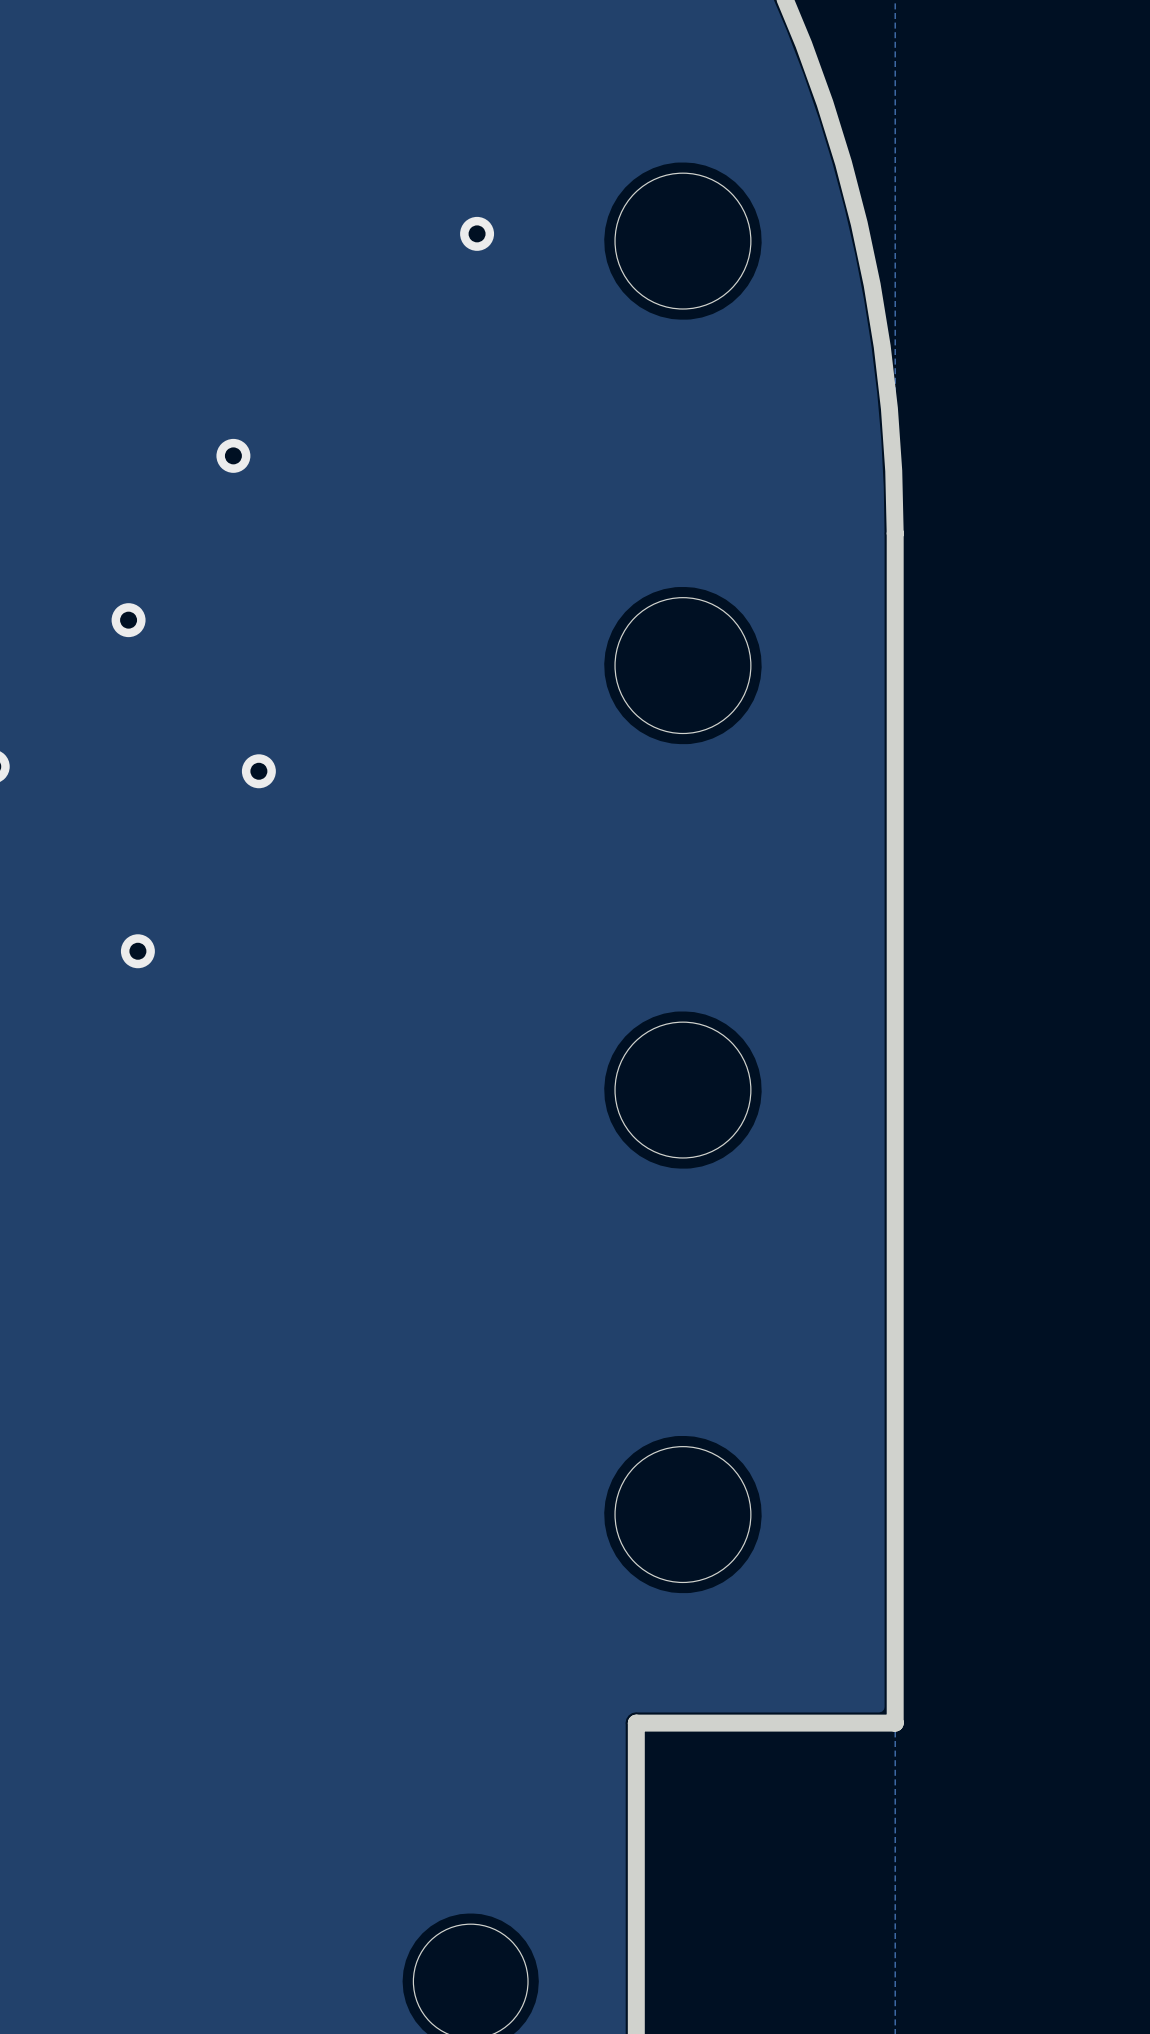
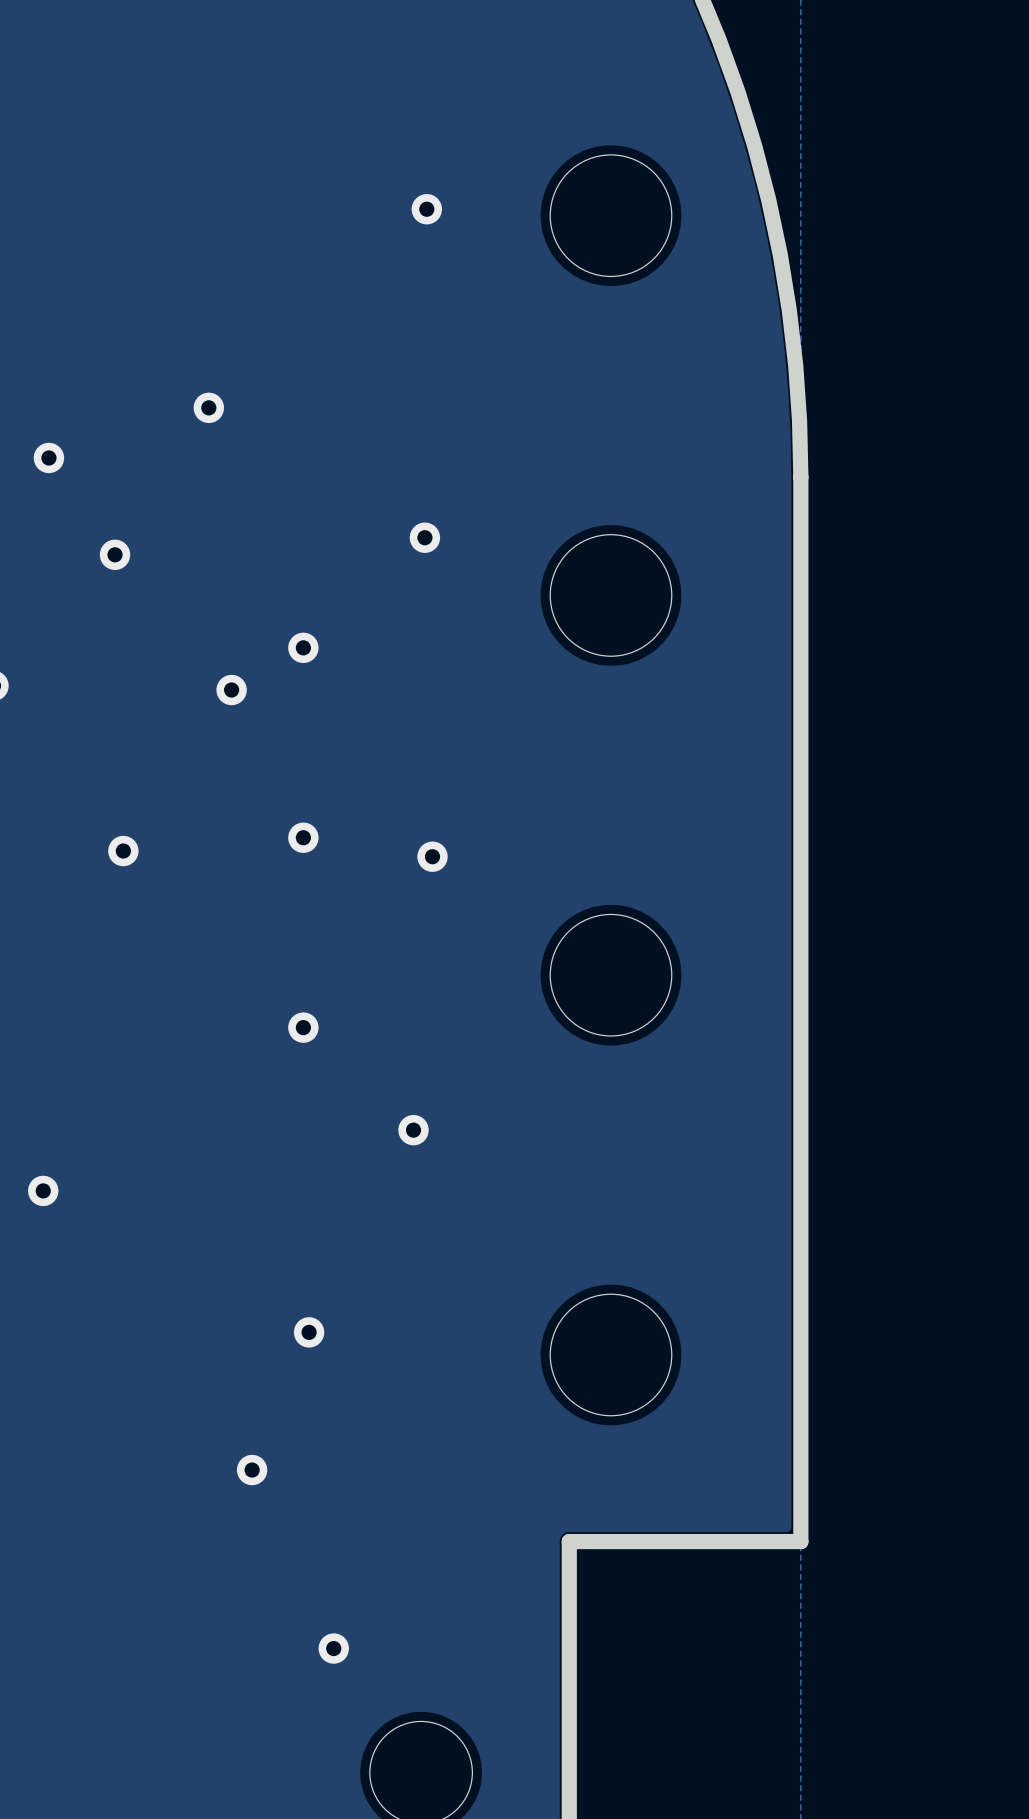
via: none -> (48, 457)
via: none -> (424, 537)
via: none -> (303, 647)
via: none -> (303, 837)
via: none -> (432, 856)
via: none -> (303, 1027)
via: none -> (413, 1130)
via: none -> (43, 1190)
via: none -> (309, 1332)
via: none -> (252, 1470)
via: none -> (333, 1648)

